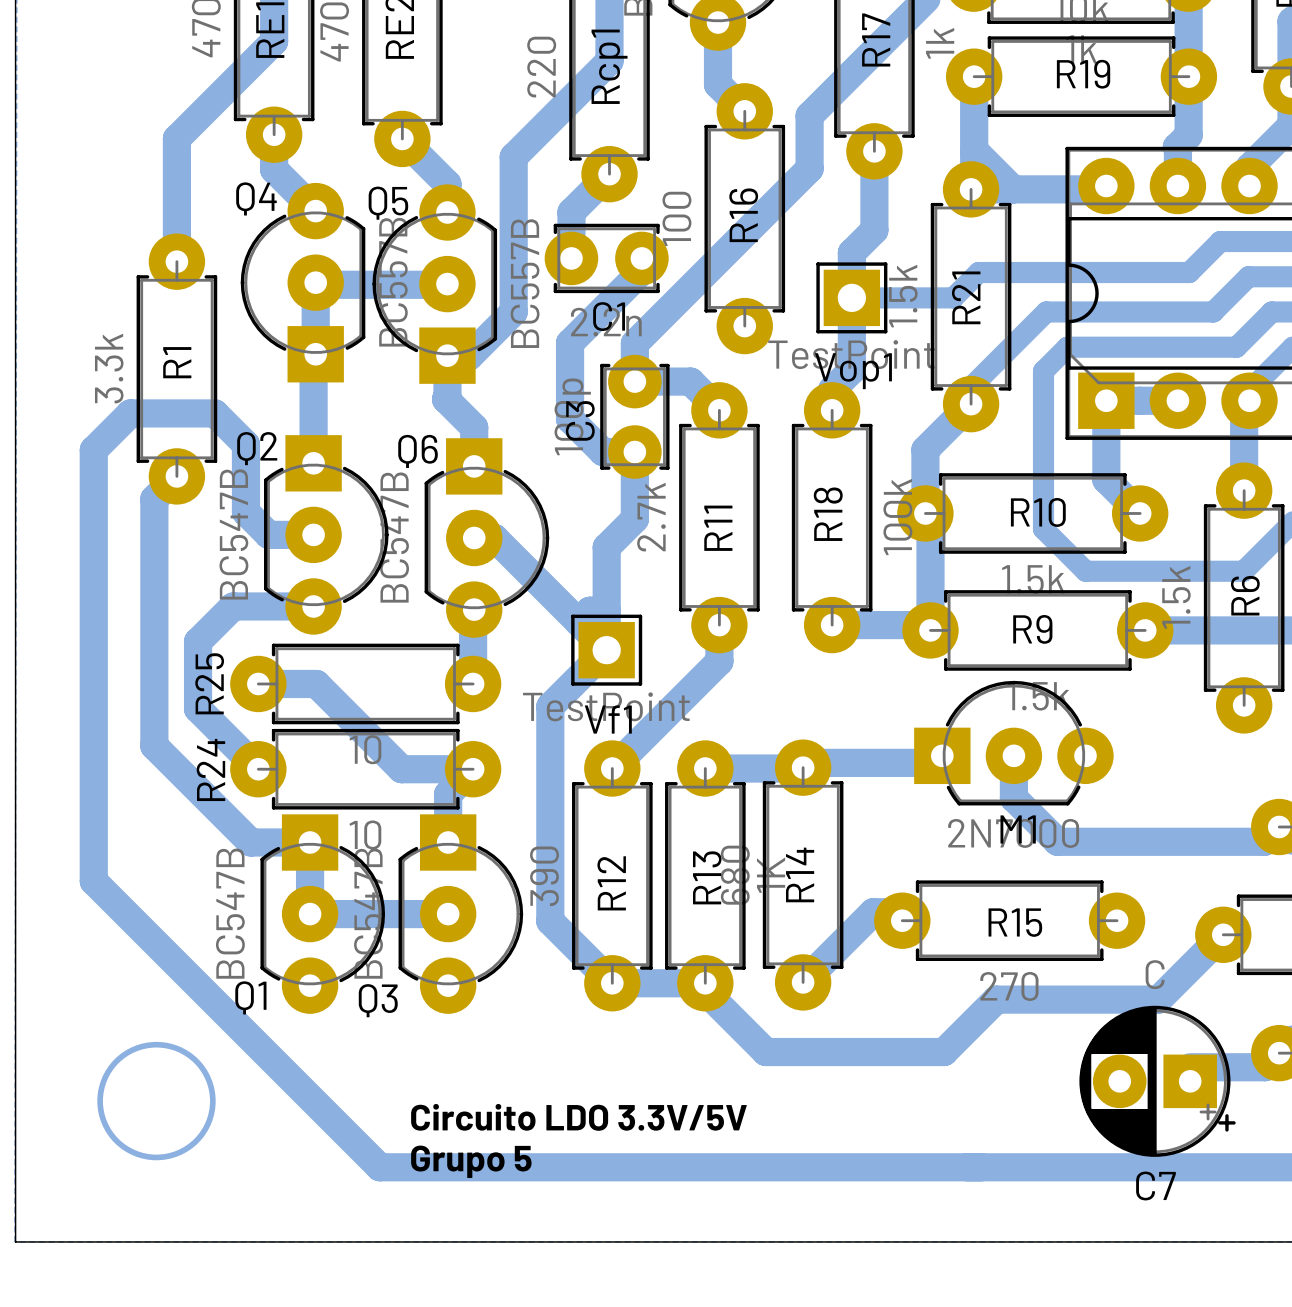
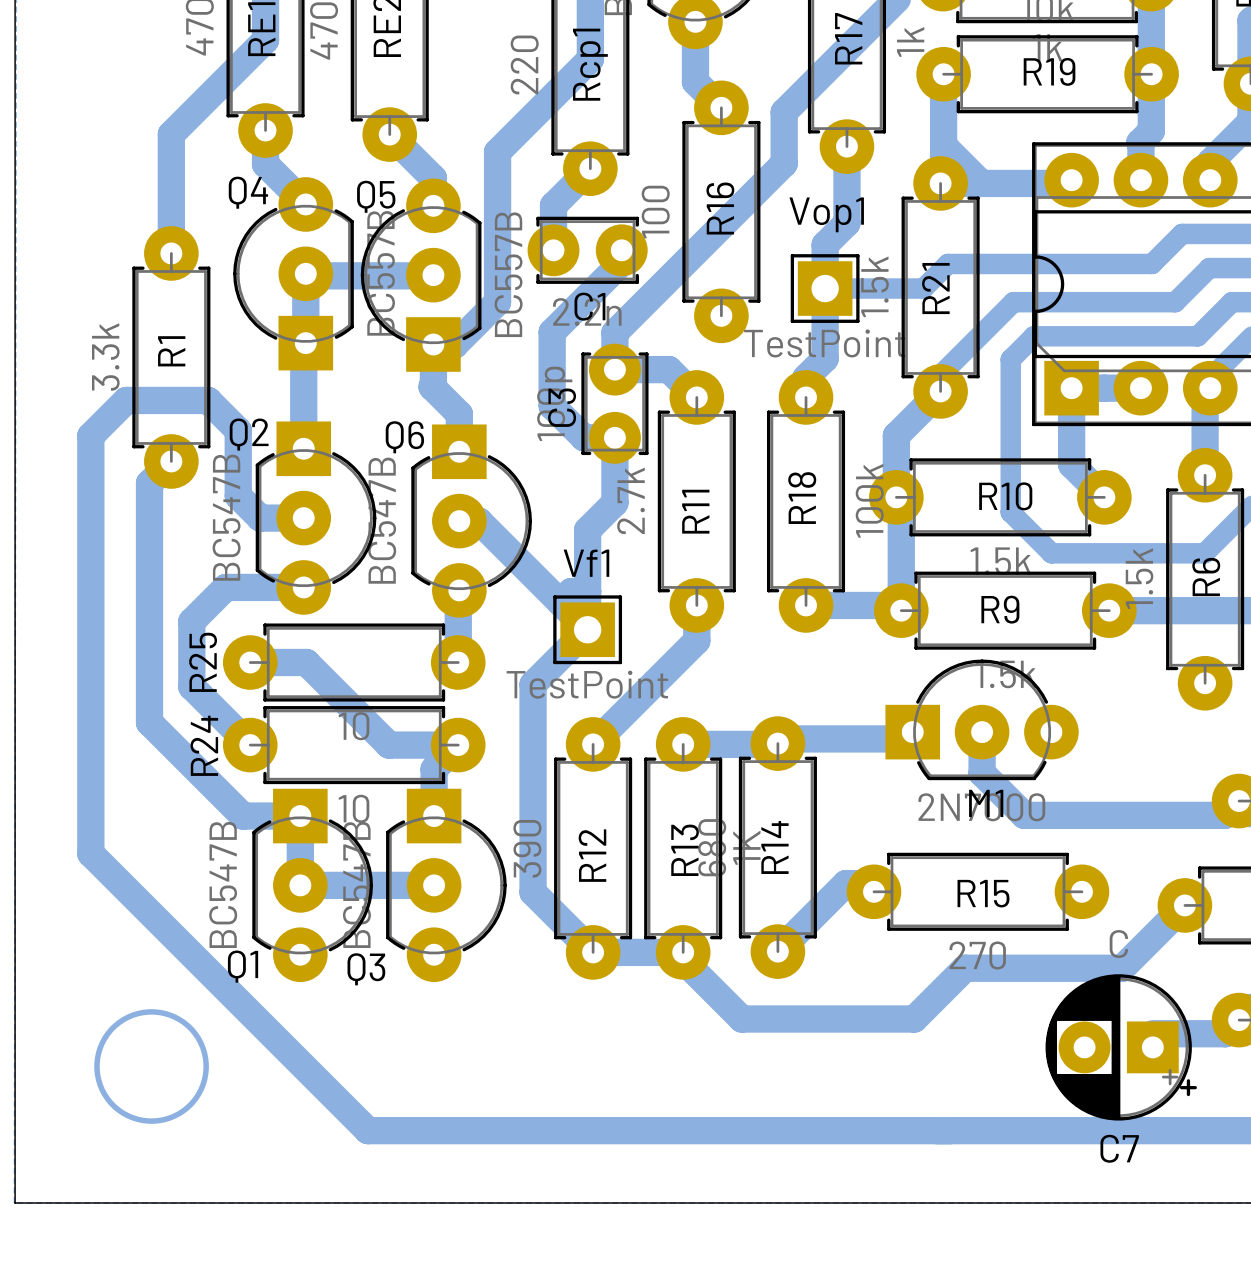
Vop1 name position: Vop1 (853, 371) -> Vop1 (826, 214)
Vf1 name position: Vf1 (608, 719) -> Vf1 (586, 563)
text: Circuito LDO 3.3V/5V (578, 1117) -> none
text: Grupo 5 (471, 1161) -> none

